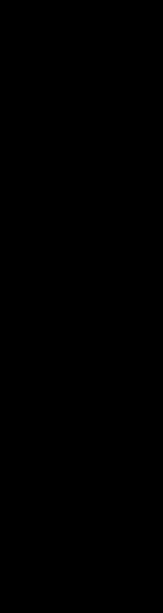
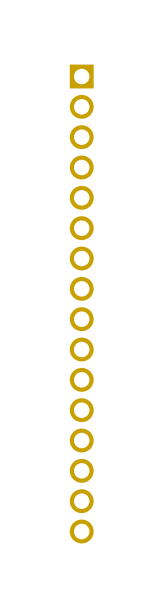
part: none -> (81, 304)

